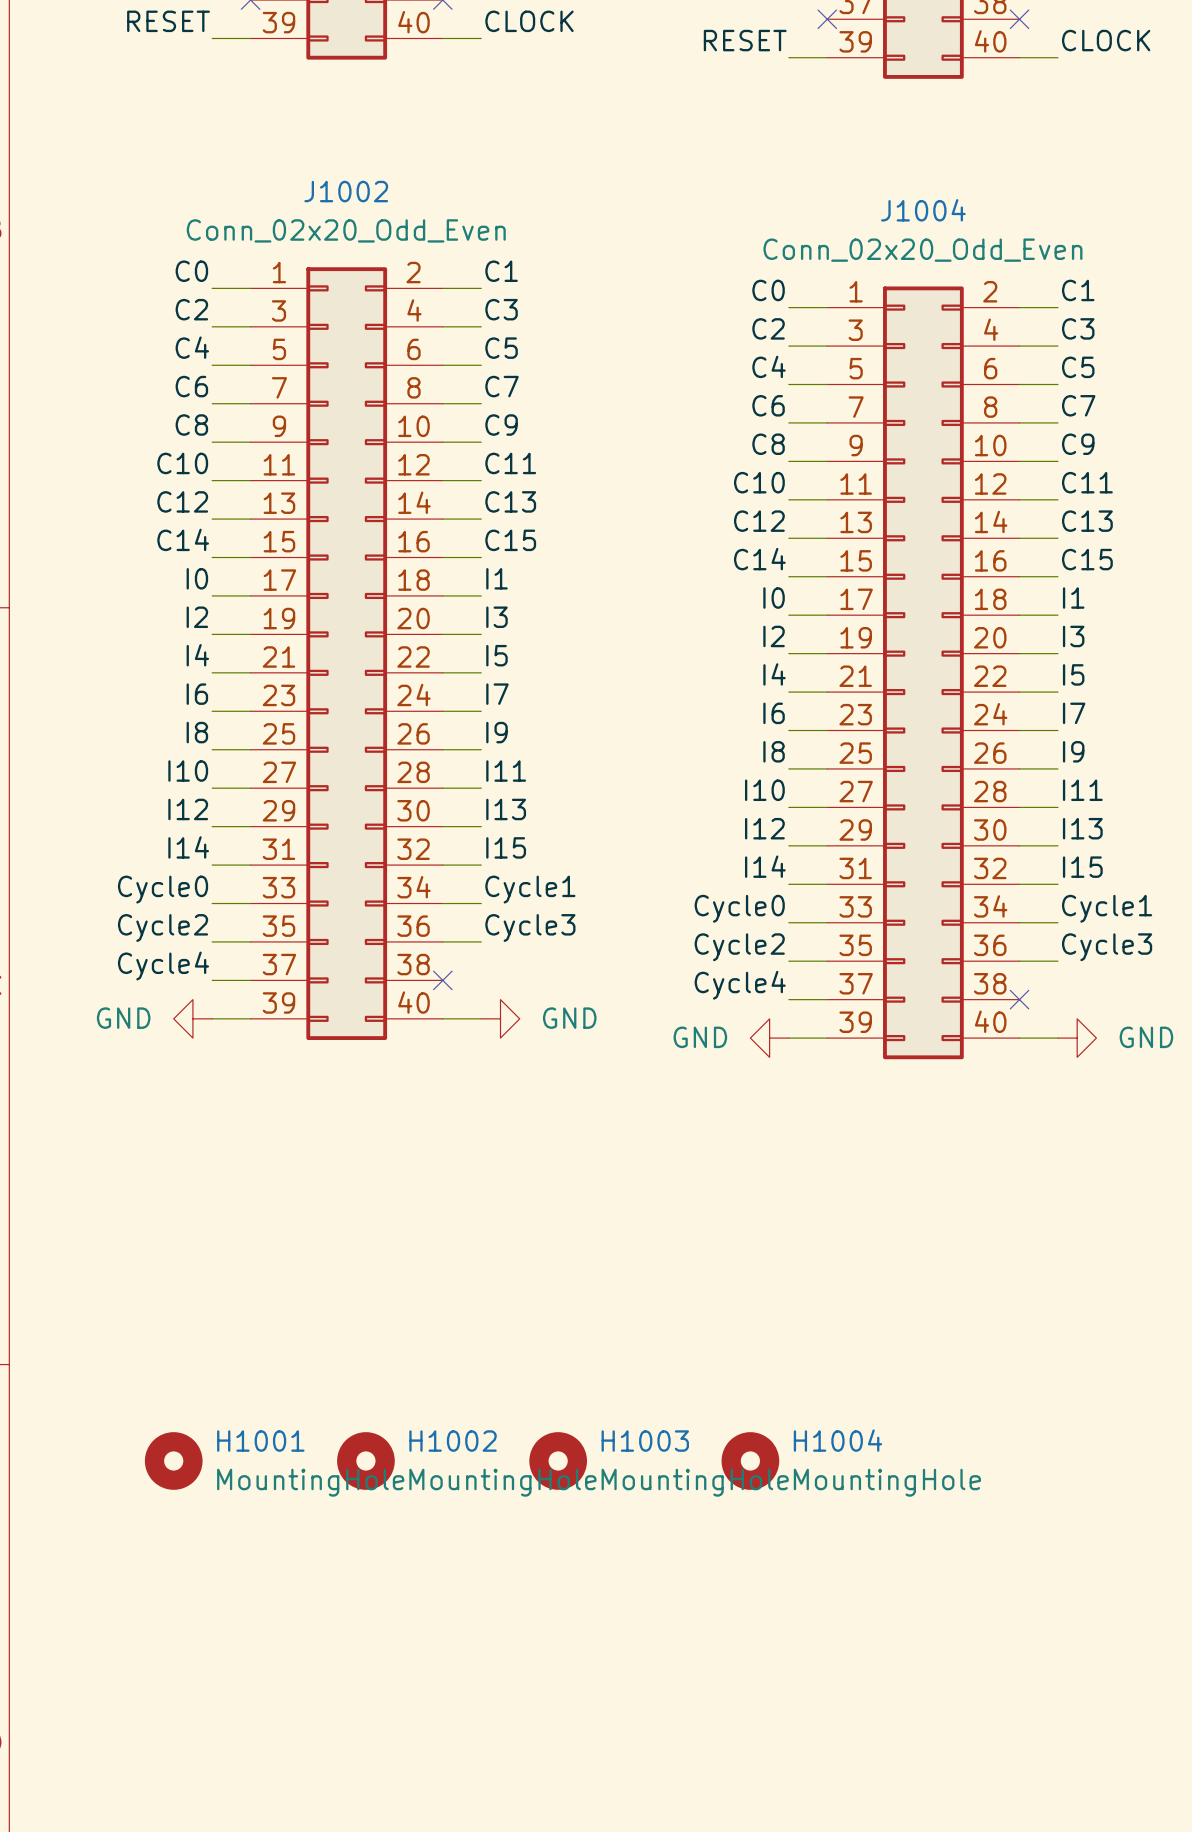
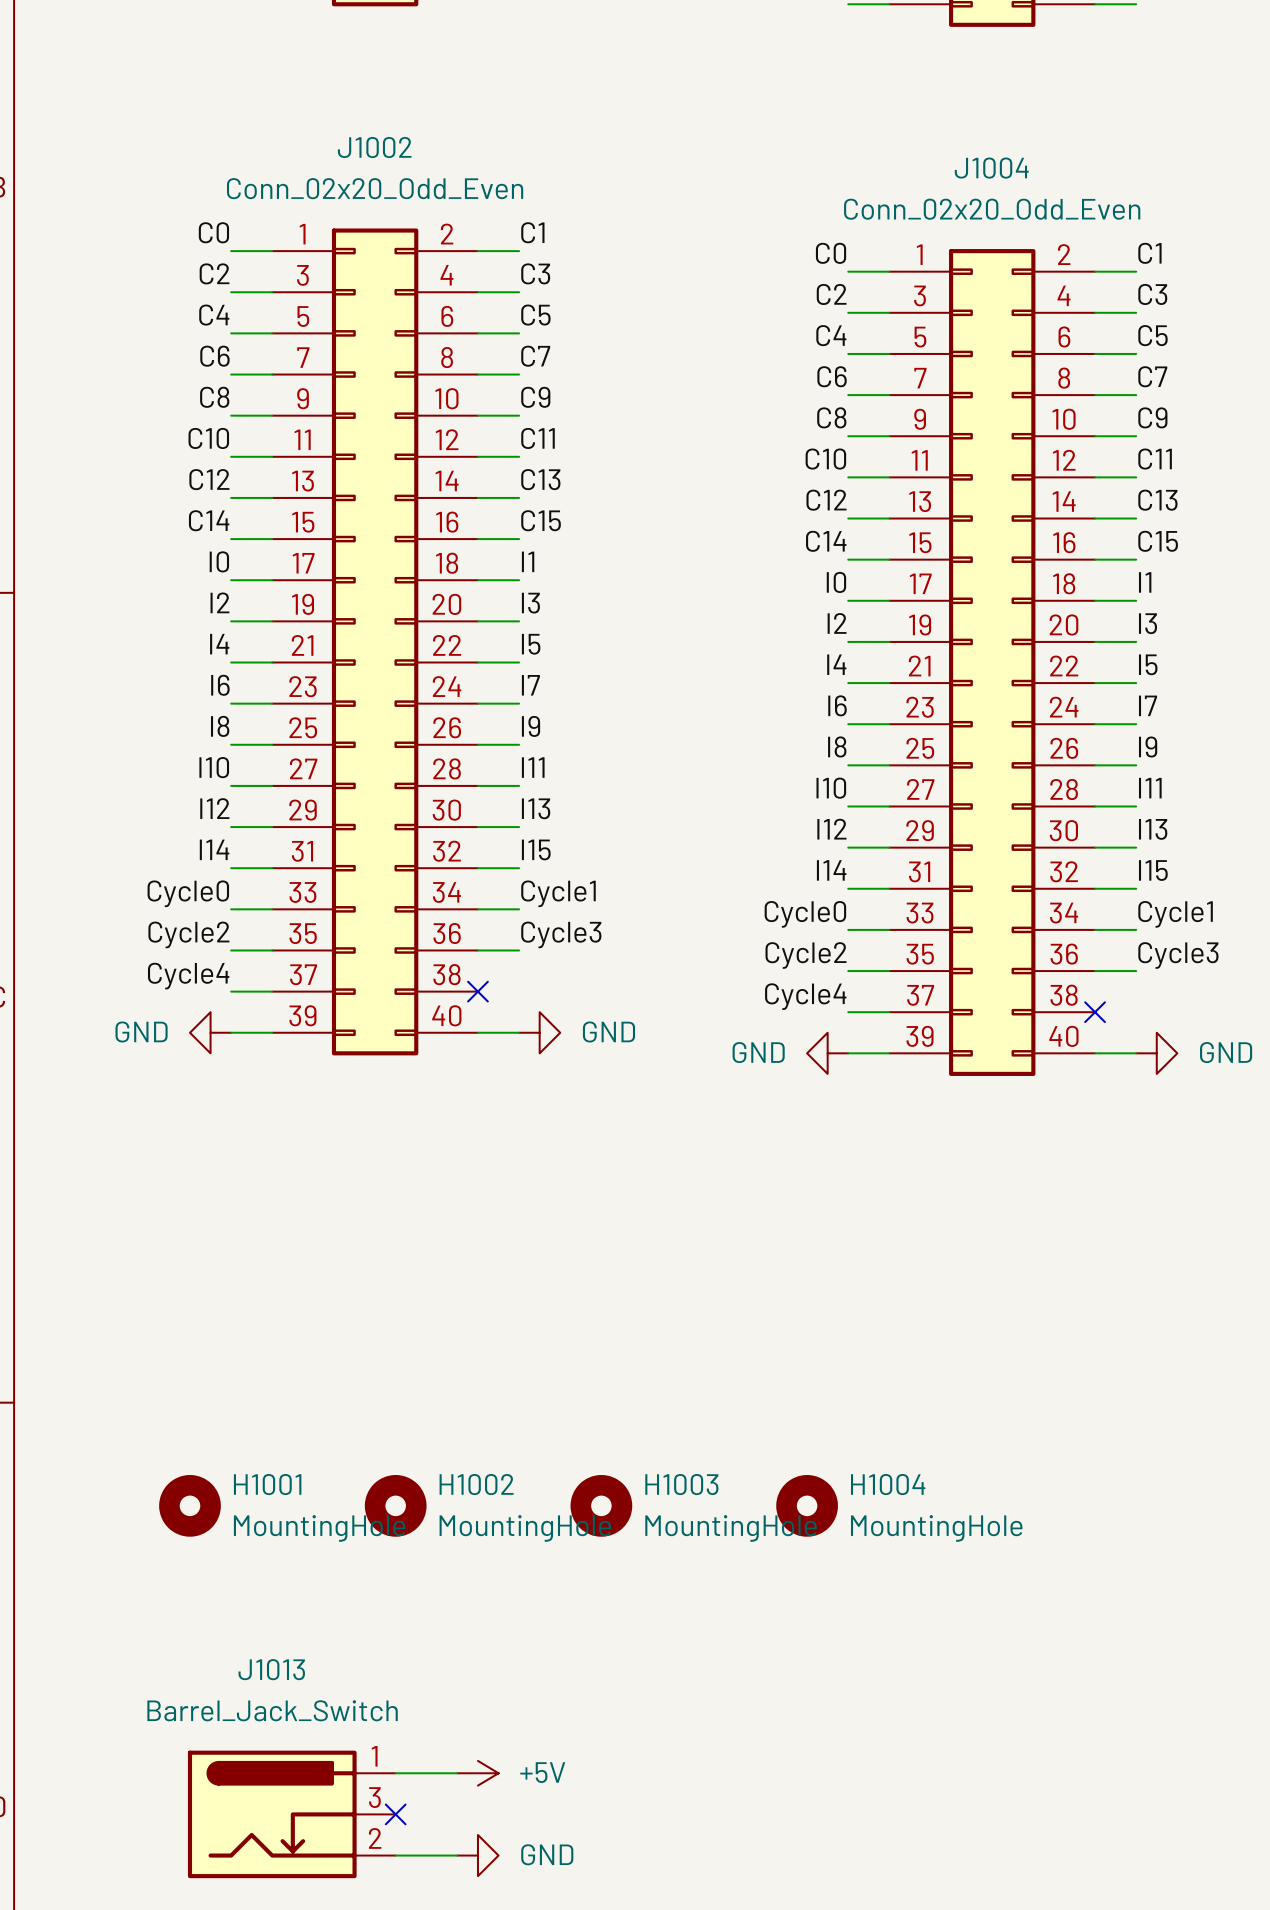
wire: none -> (395, 1773) (457, 1773)
power symbol: none -> +5V (477, 1773)
J1013: none -> Barrel_Jack_Switch (291, 1814)
no-connect mark: none -> (395, 1814)
wire: none -> (395, 1855) (457, 1855)
power symbol: none -> GND (477, 1855)

